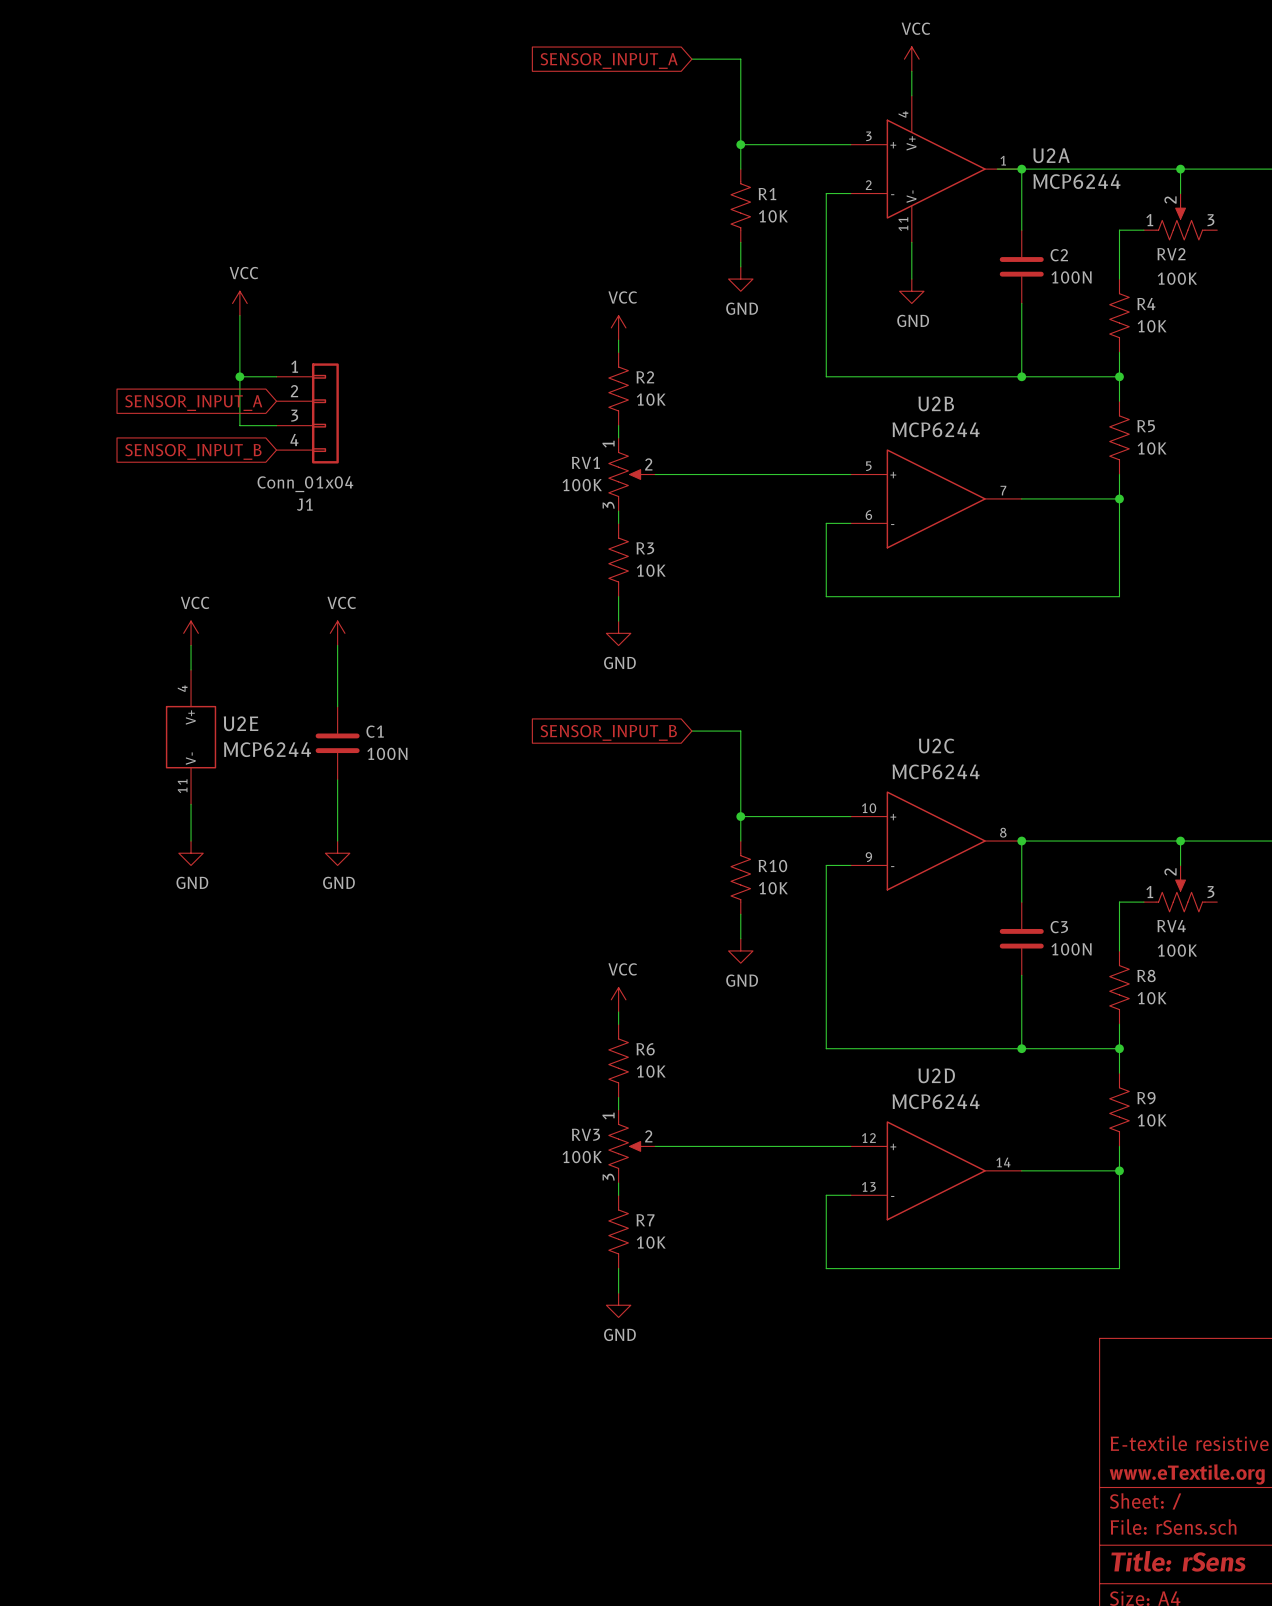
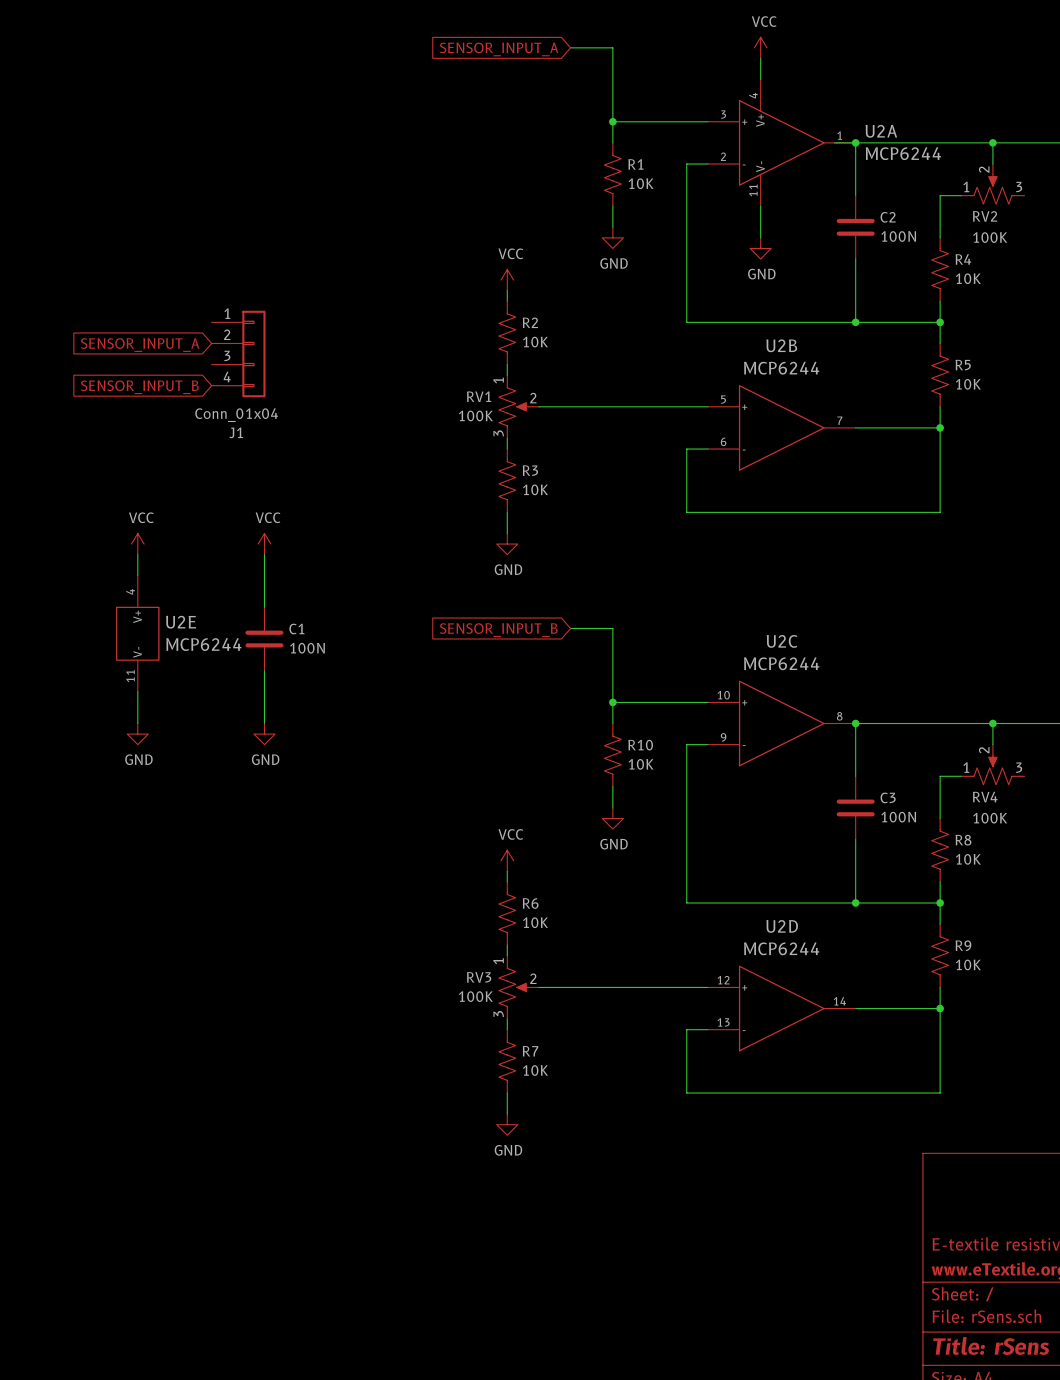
power symbol: VCC (239, 303) -> none
wire: (239, 315) (239, 425) (276, 425) -> none
wire: (239, 376) (276, 376) -> none
junction: (239, 376) -> none

